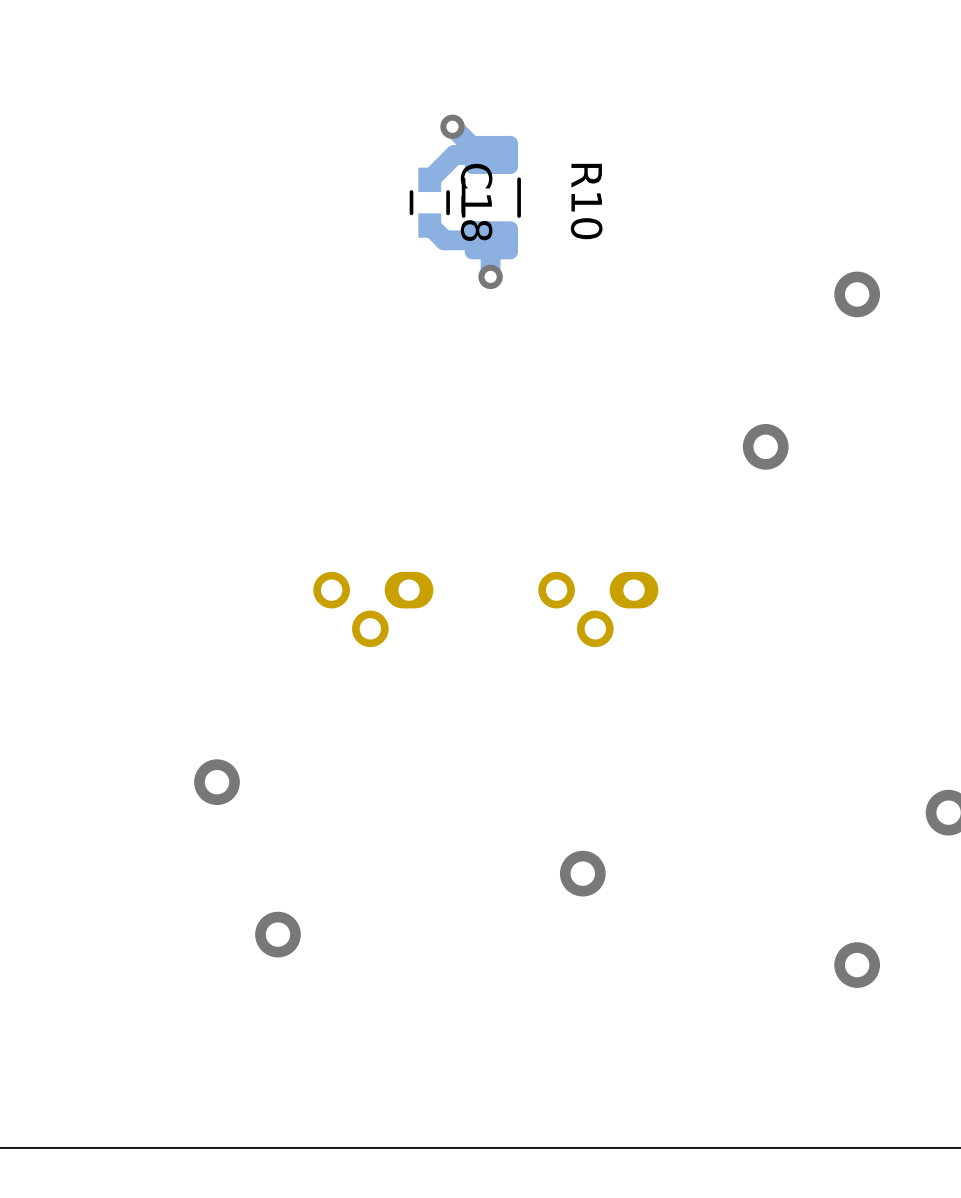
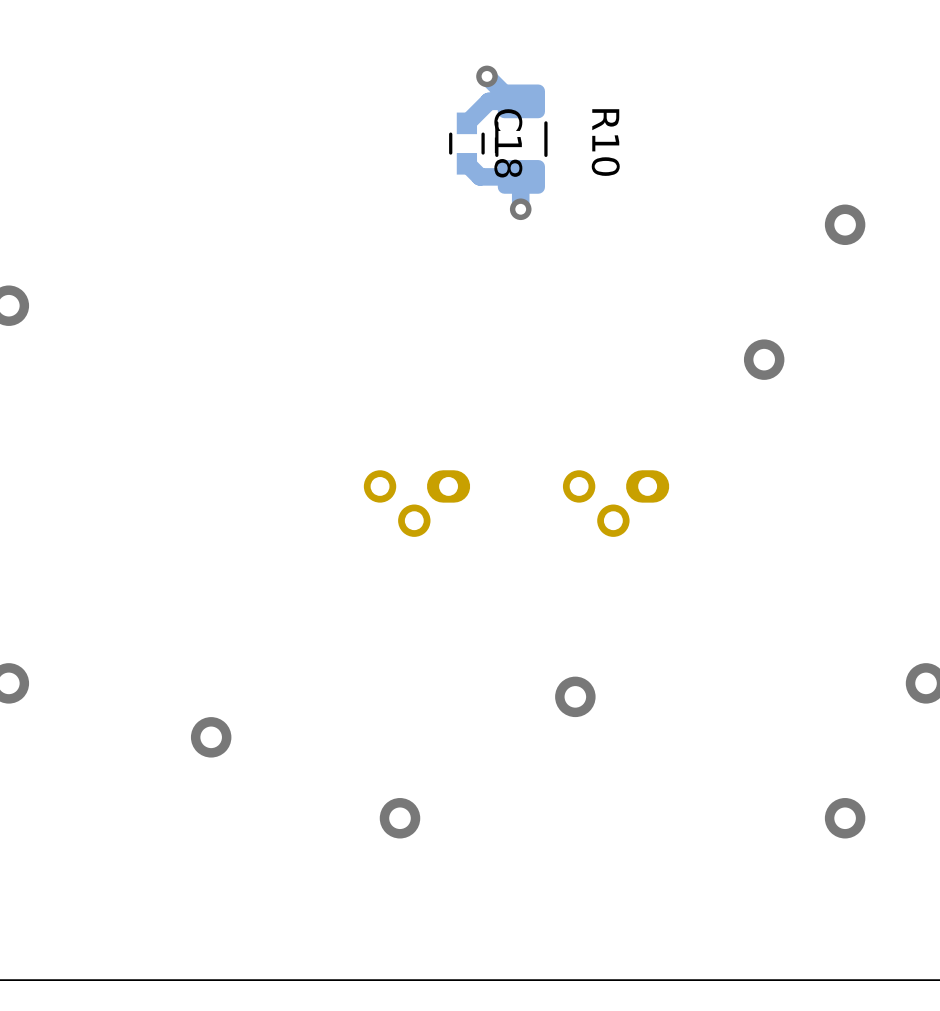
via: (217, 782) -> none
via: none -> (211, 737)
via position: (582, 873) -> (575, 696)
via: (277, 934) -> none
via: none -> (400, 818)

